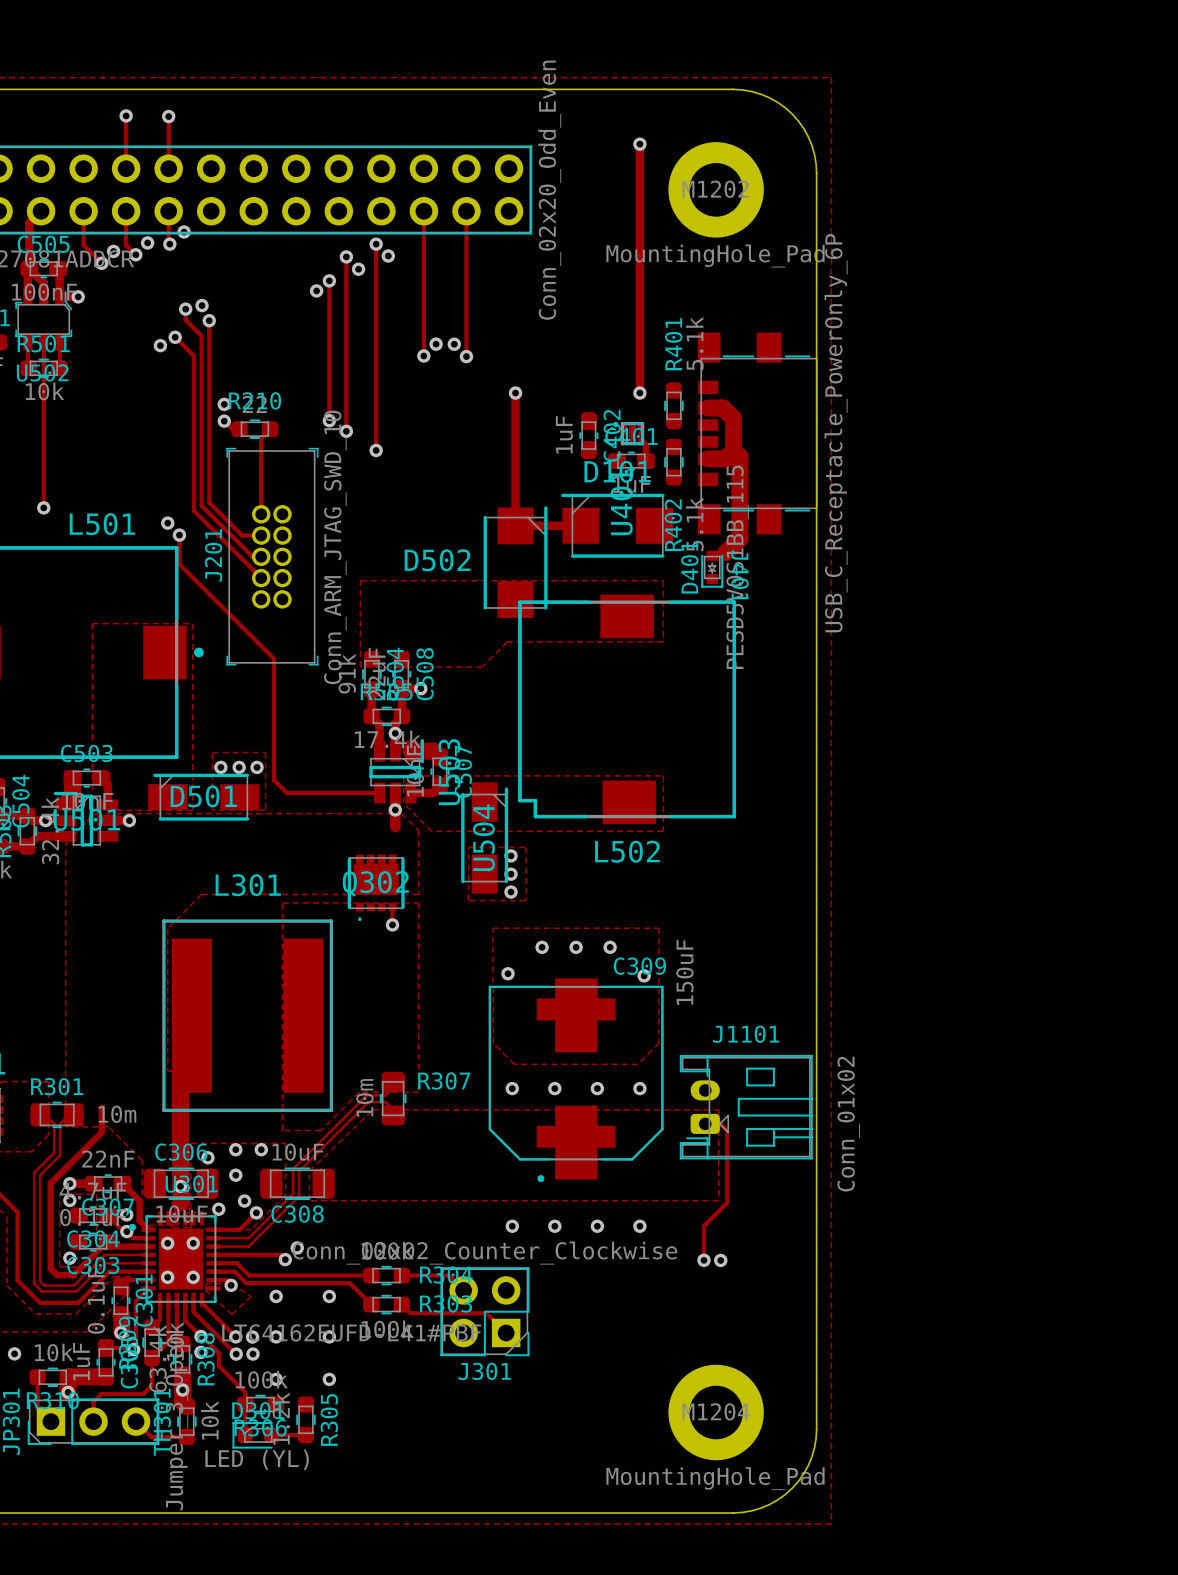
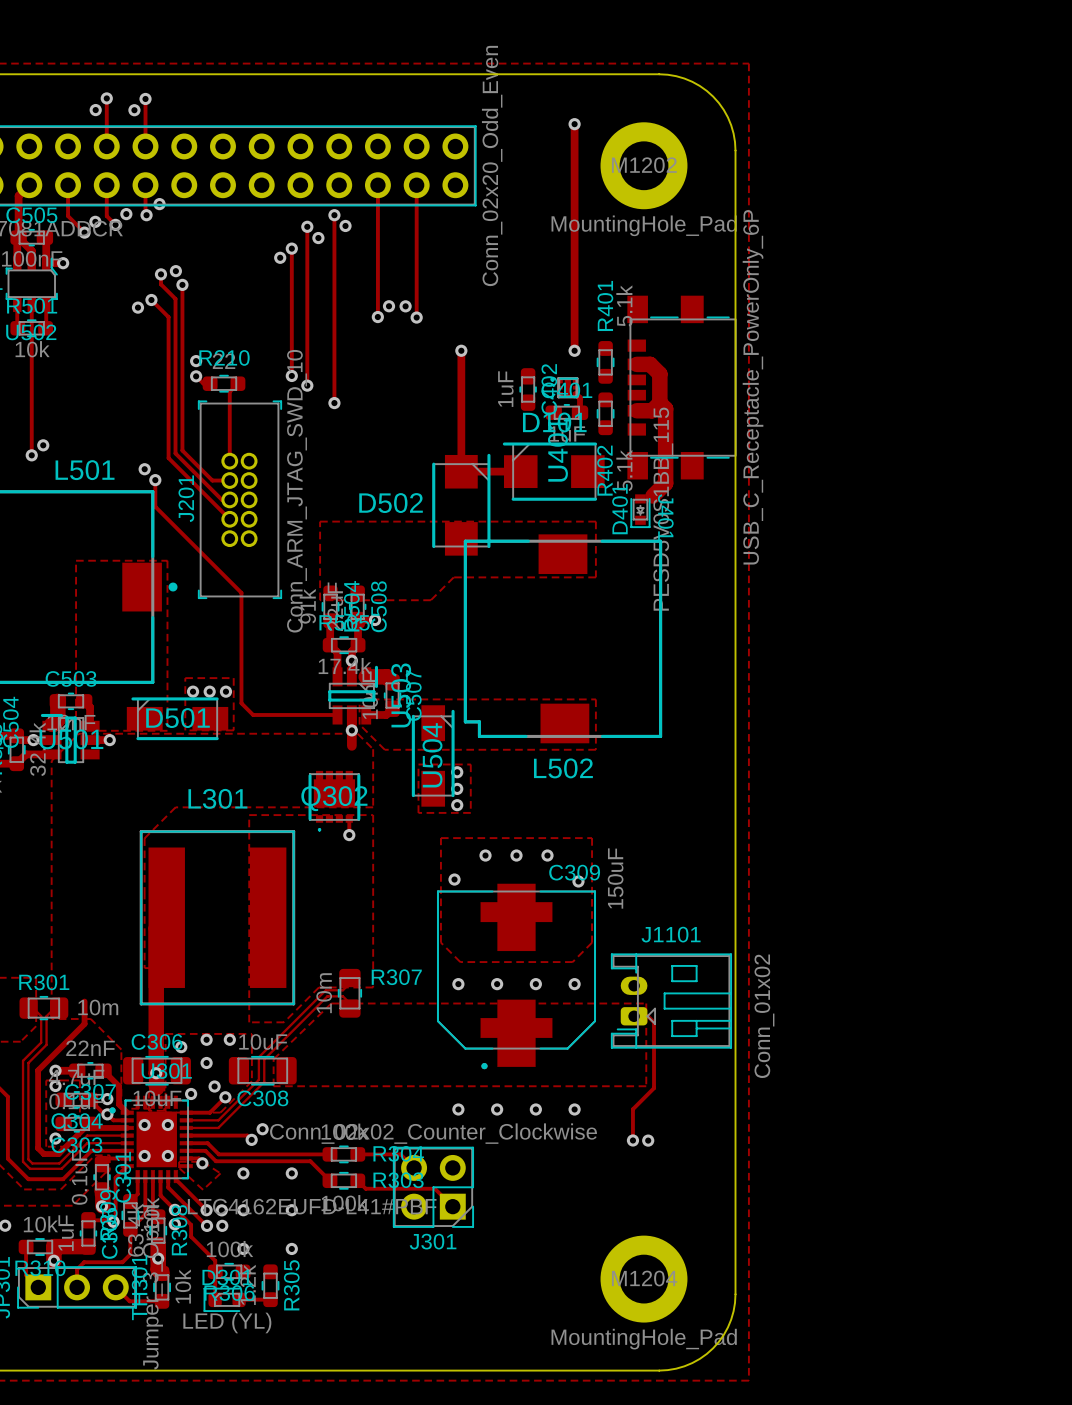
via: none -> (95, 110)
via: none -> (134, 110)
via: none -> (43, 445)

